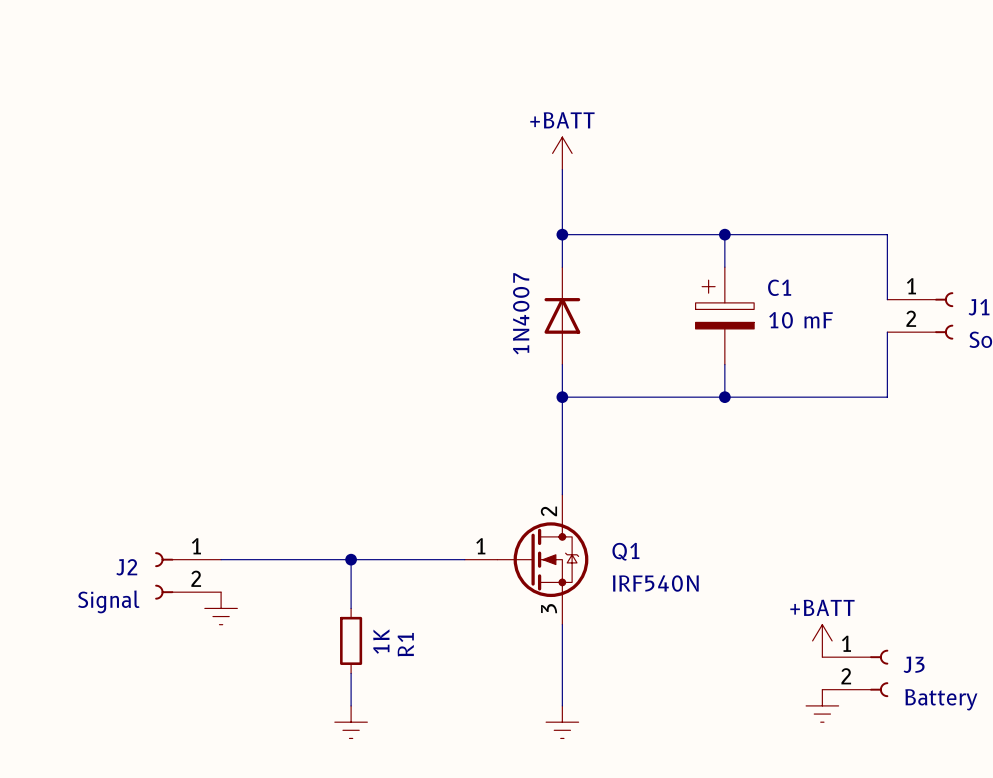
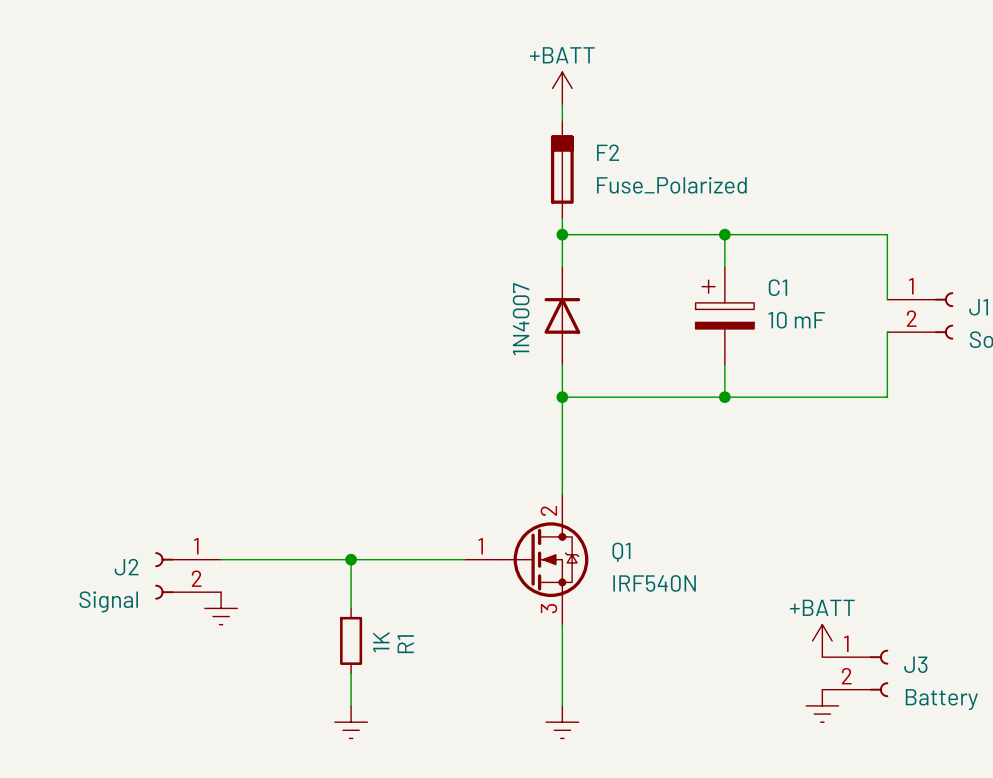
wire: none -> (562, 104) (562, 120)
power symbol position: +BATT (562, 153) -> +BATT (562, 88)
F2: none -> Fuse_Polarized (562, 169)

